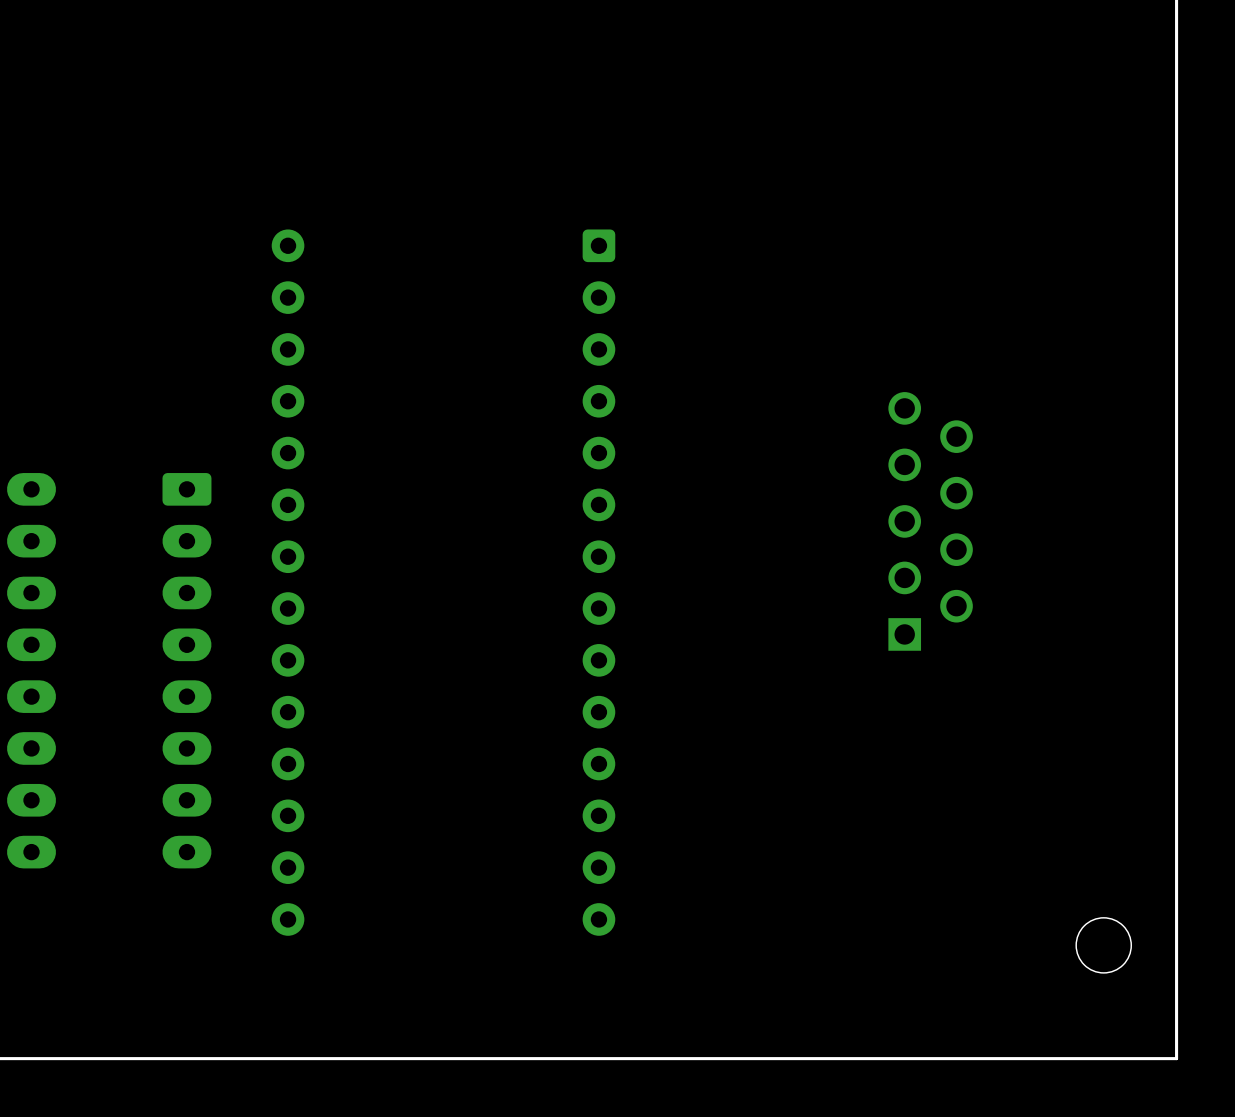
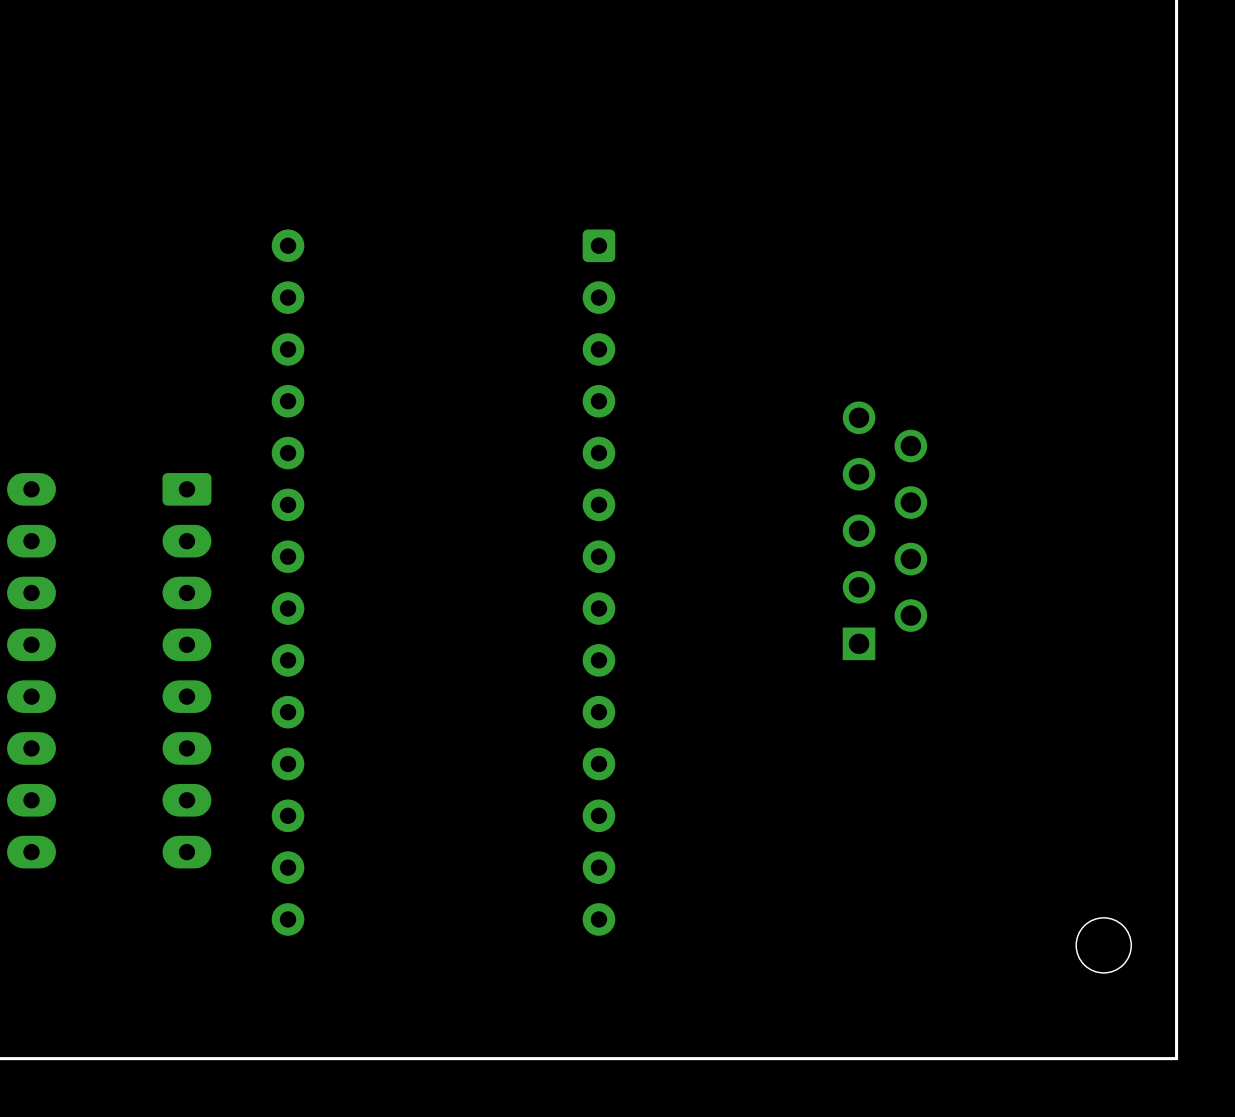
part position: (930, 521) -> (884, 530)

